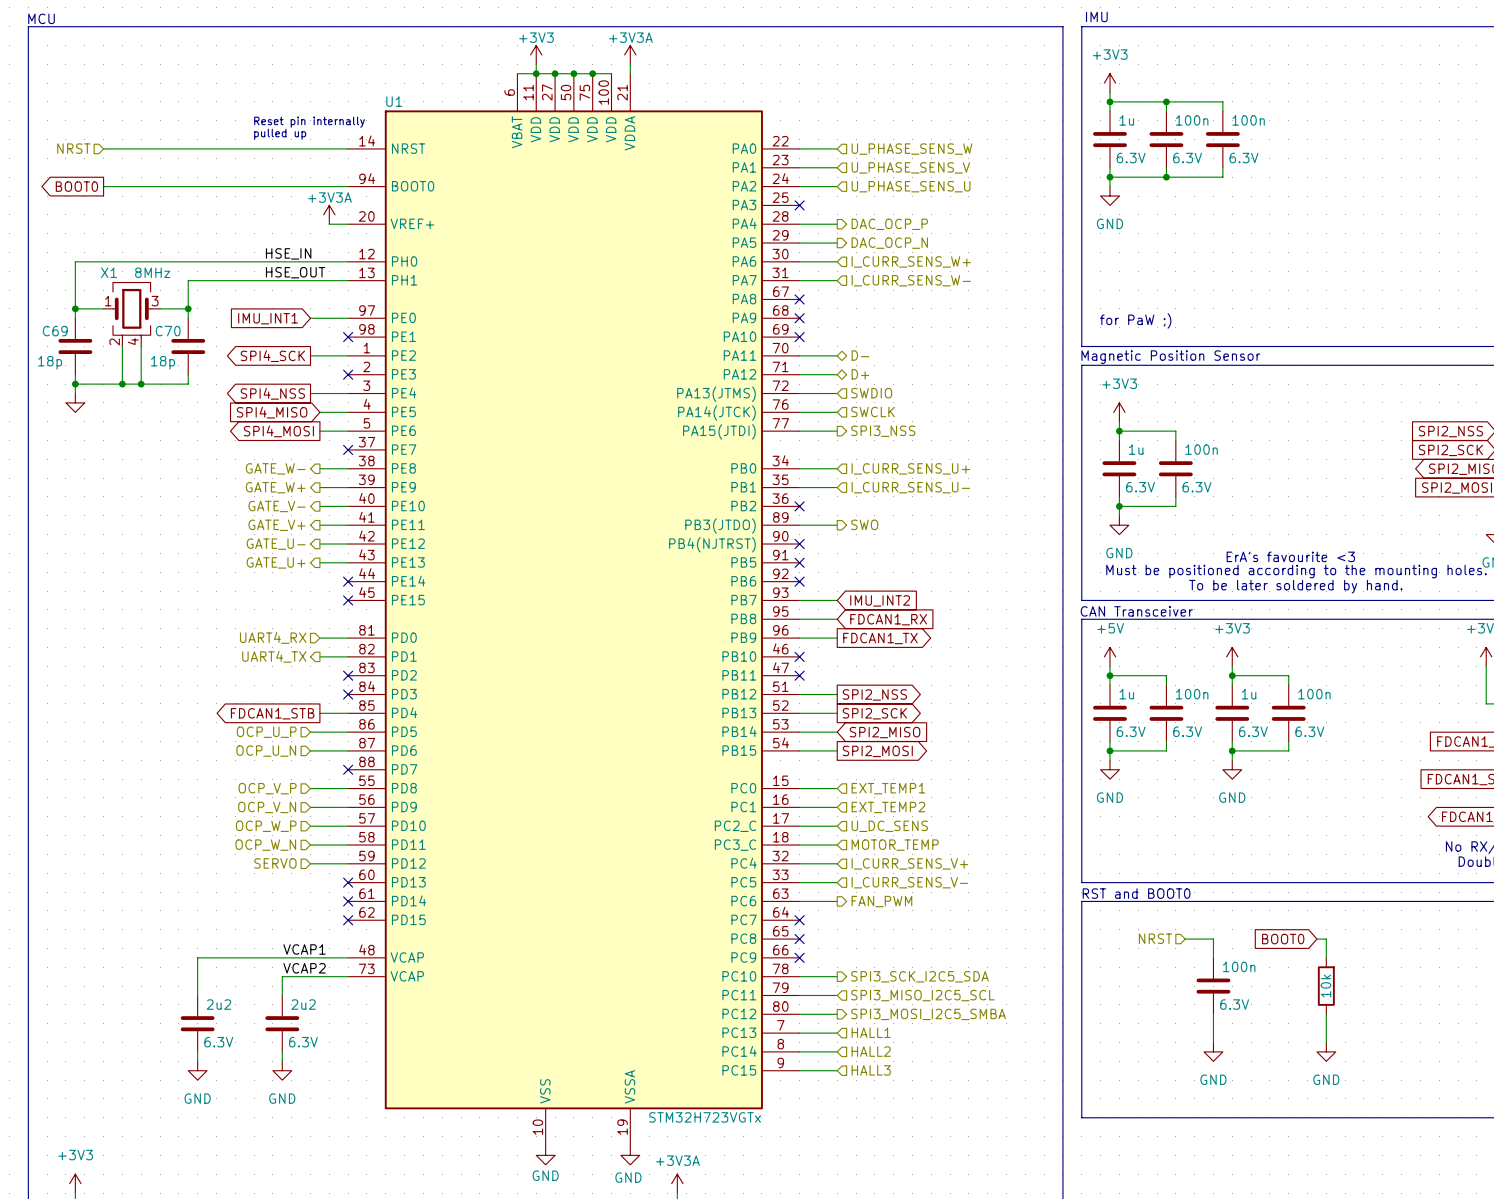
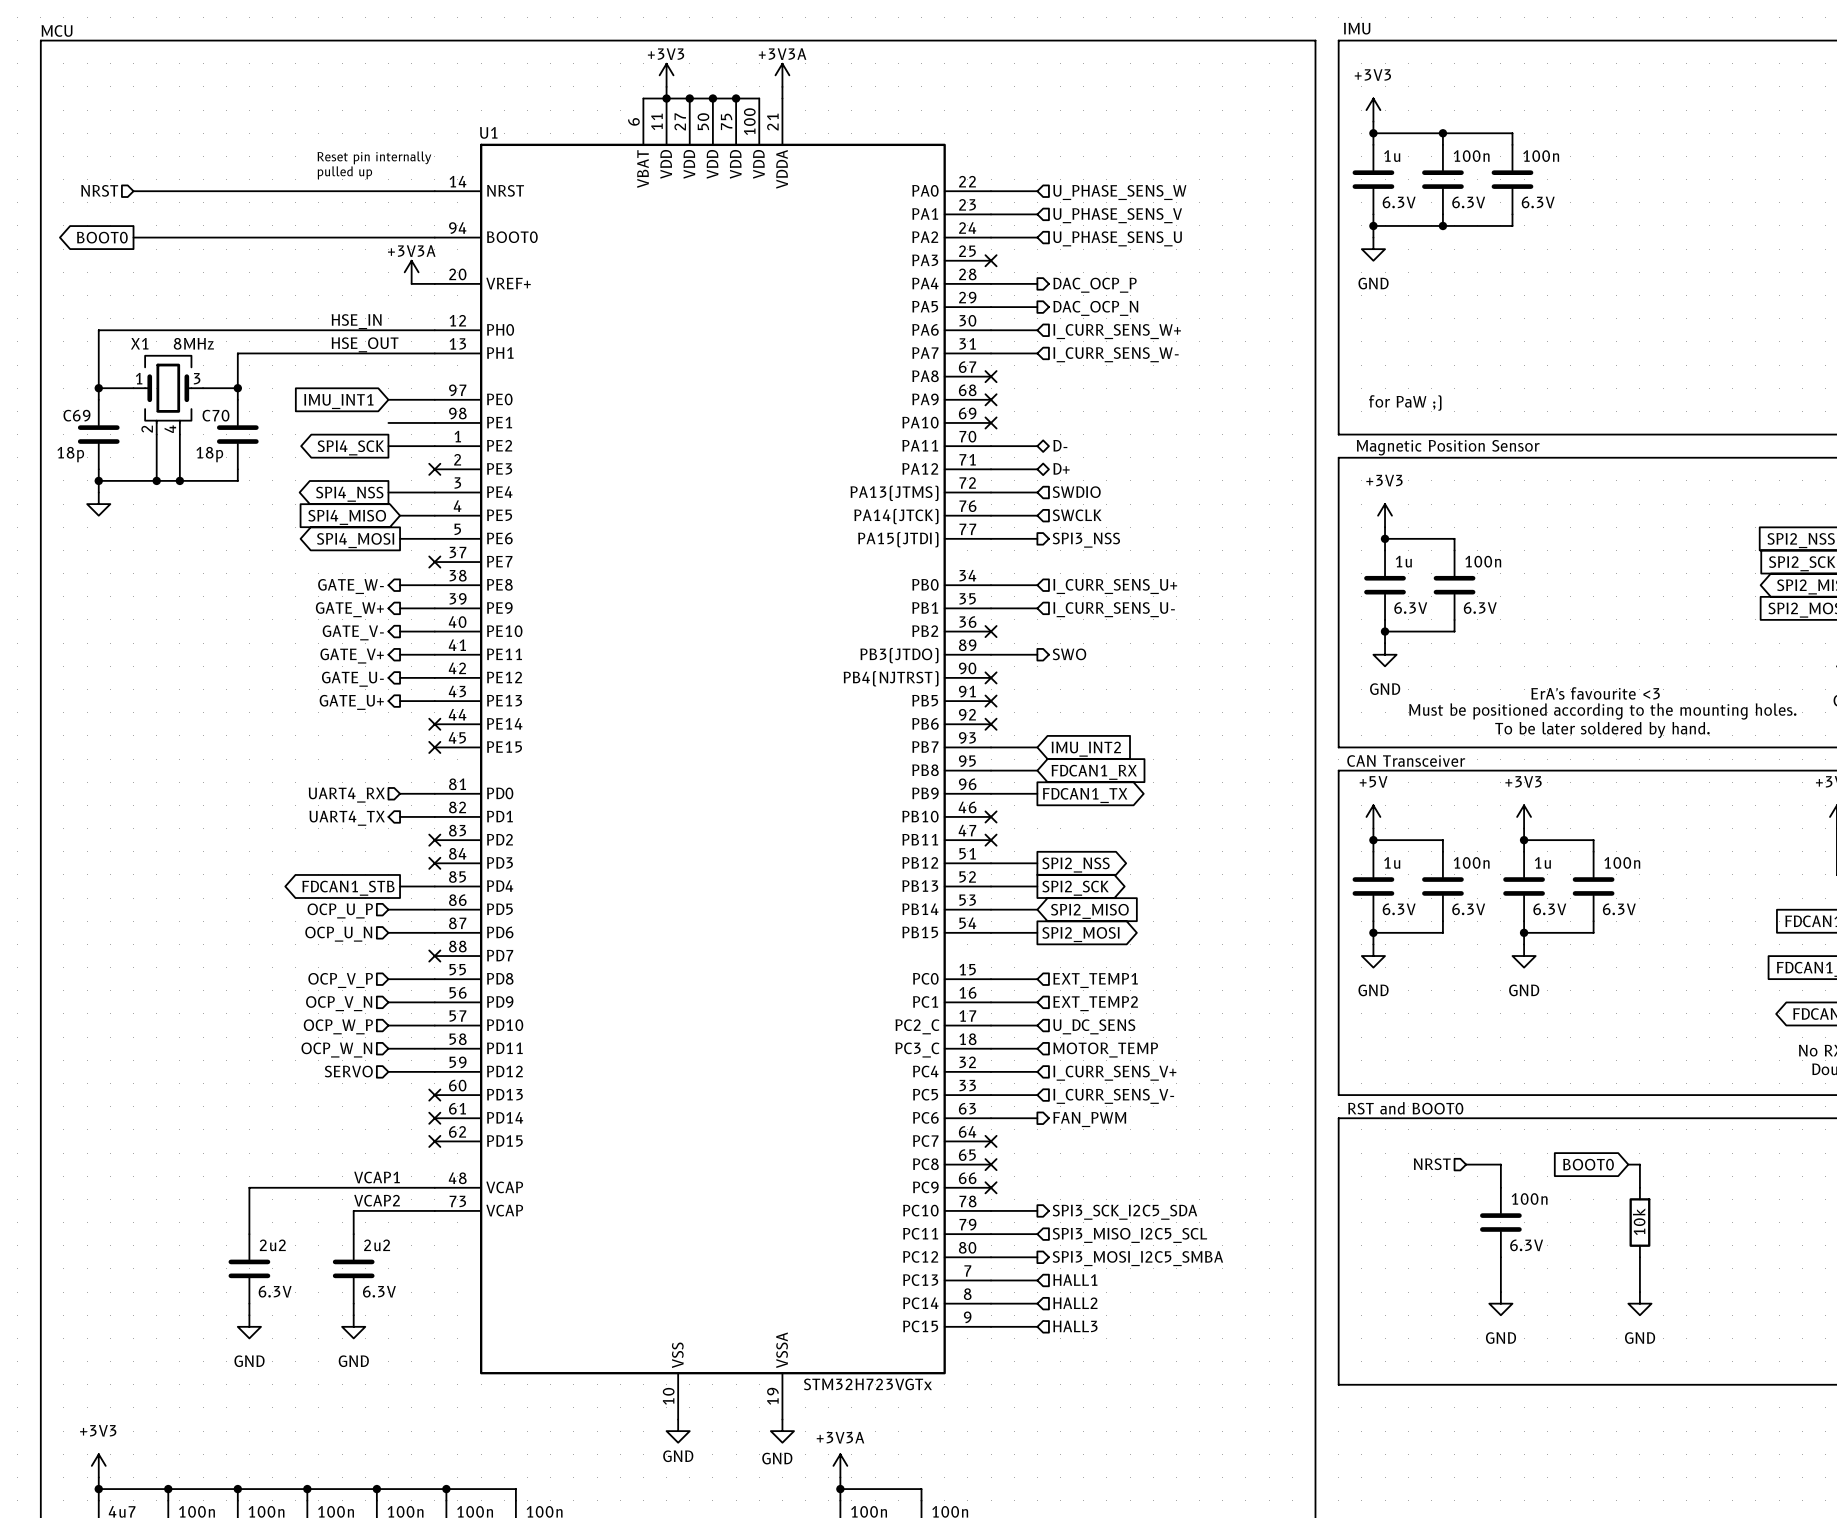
wire: none -> (388, 422) (434, 422)
no-connect mark: (348, 337) -> none

